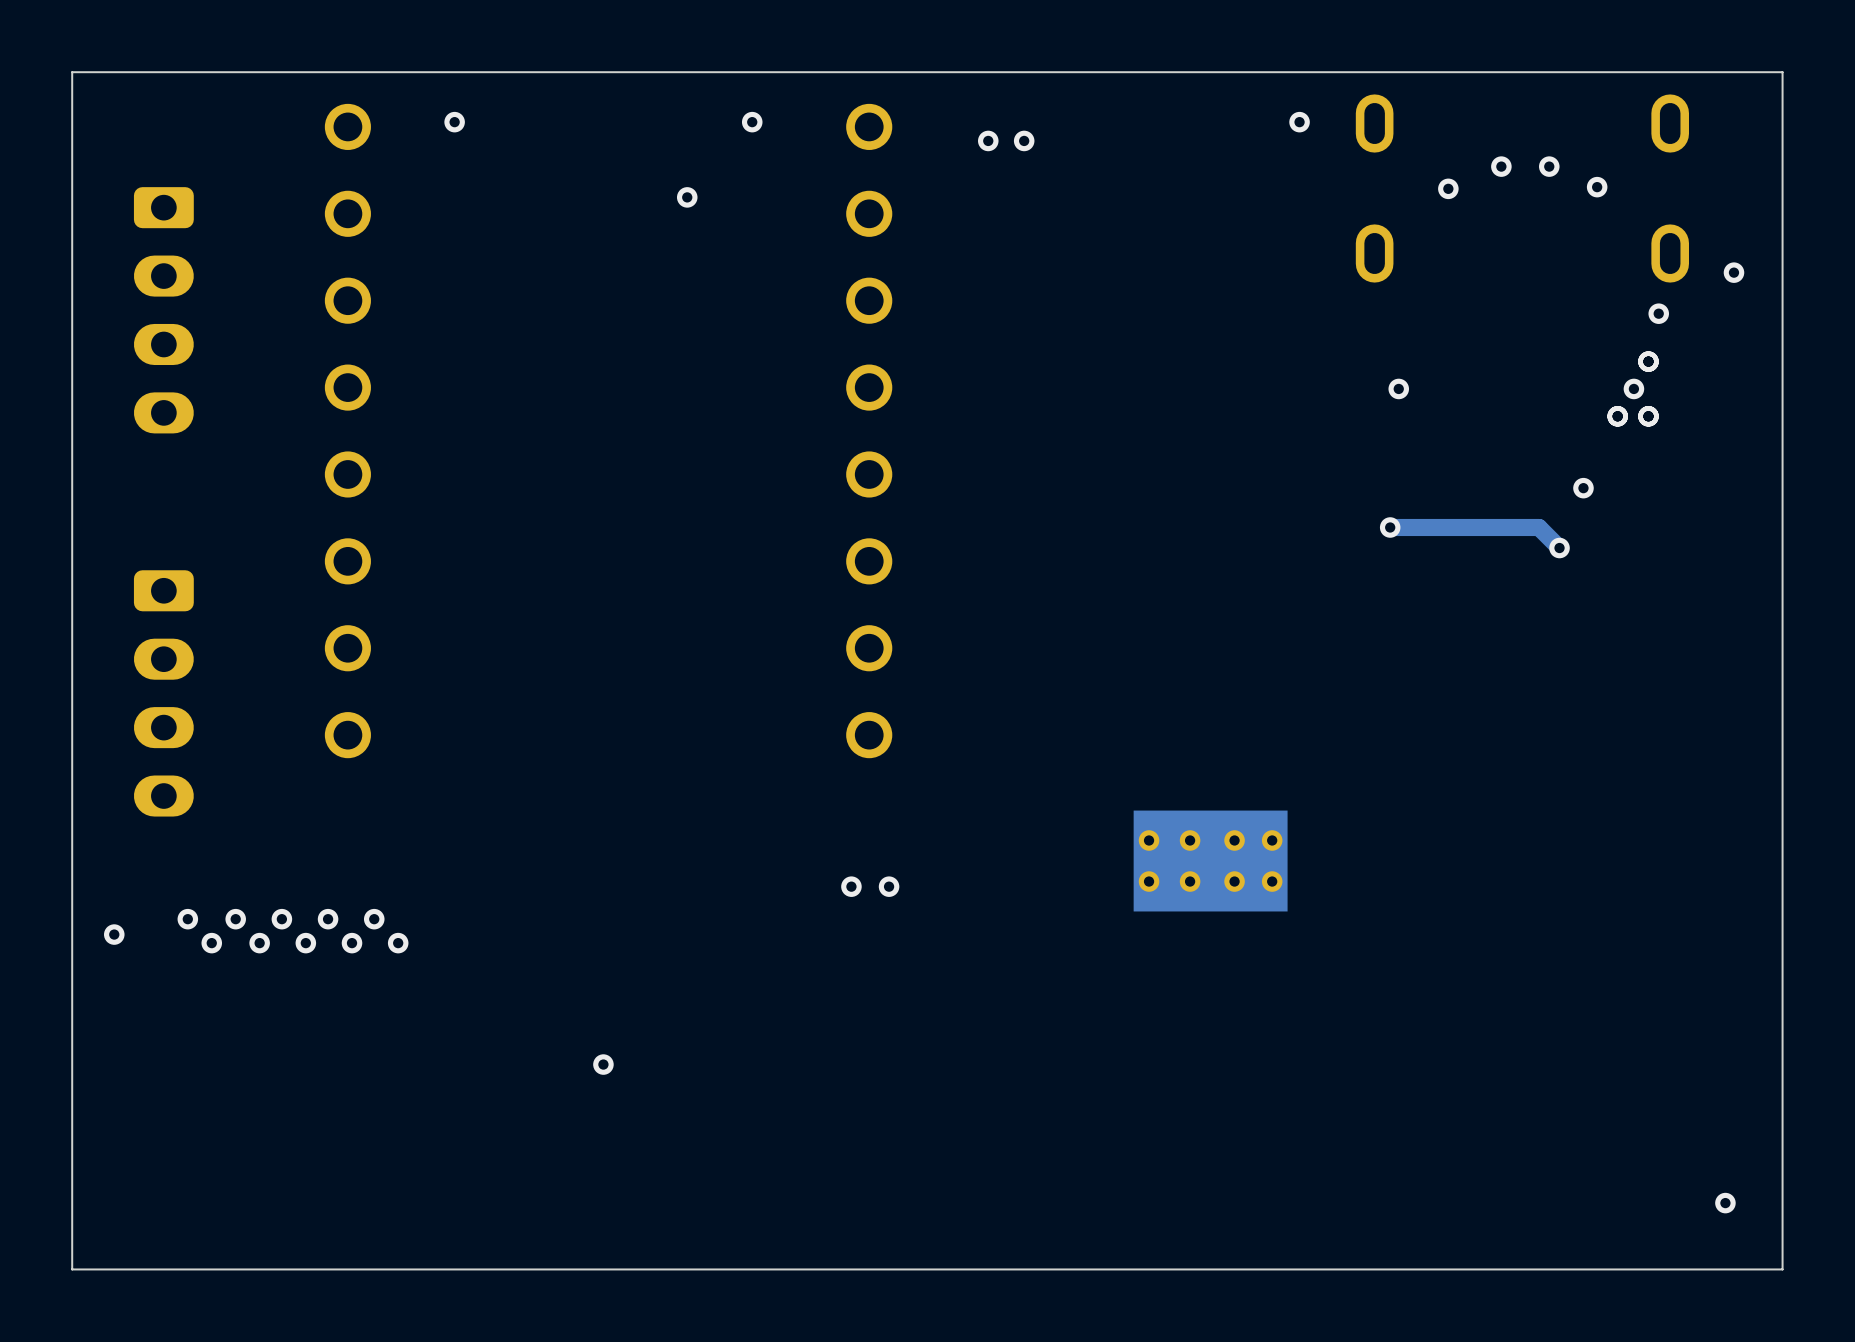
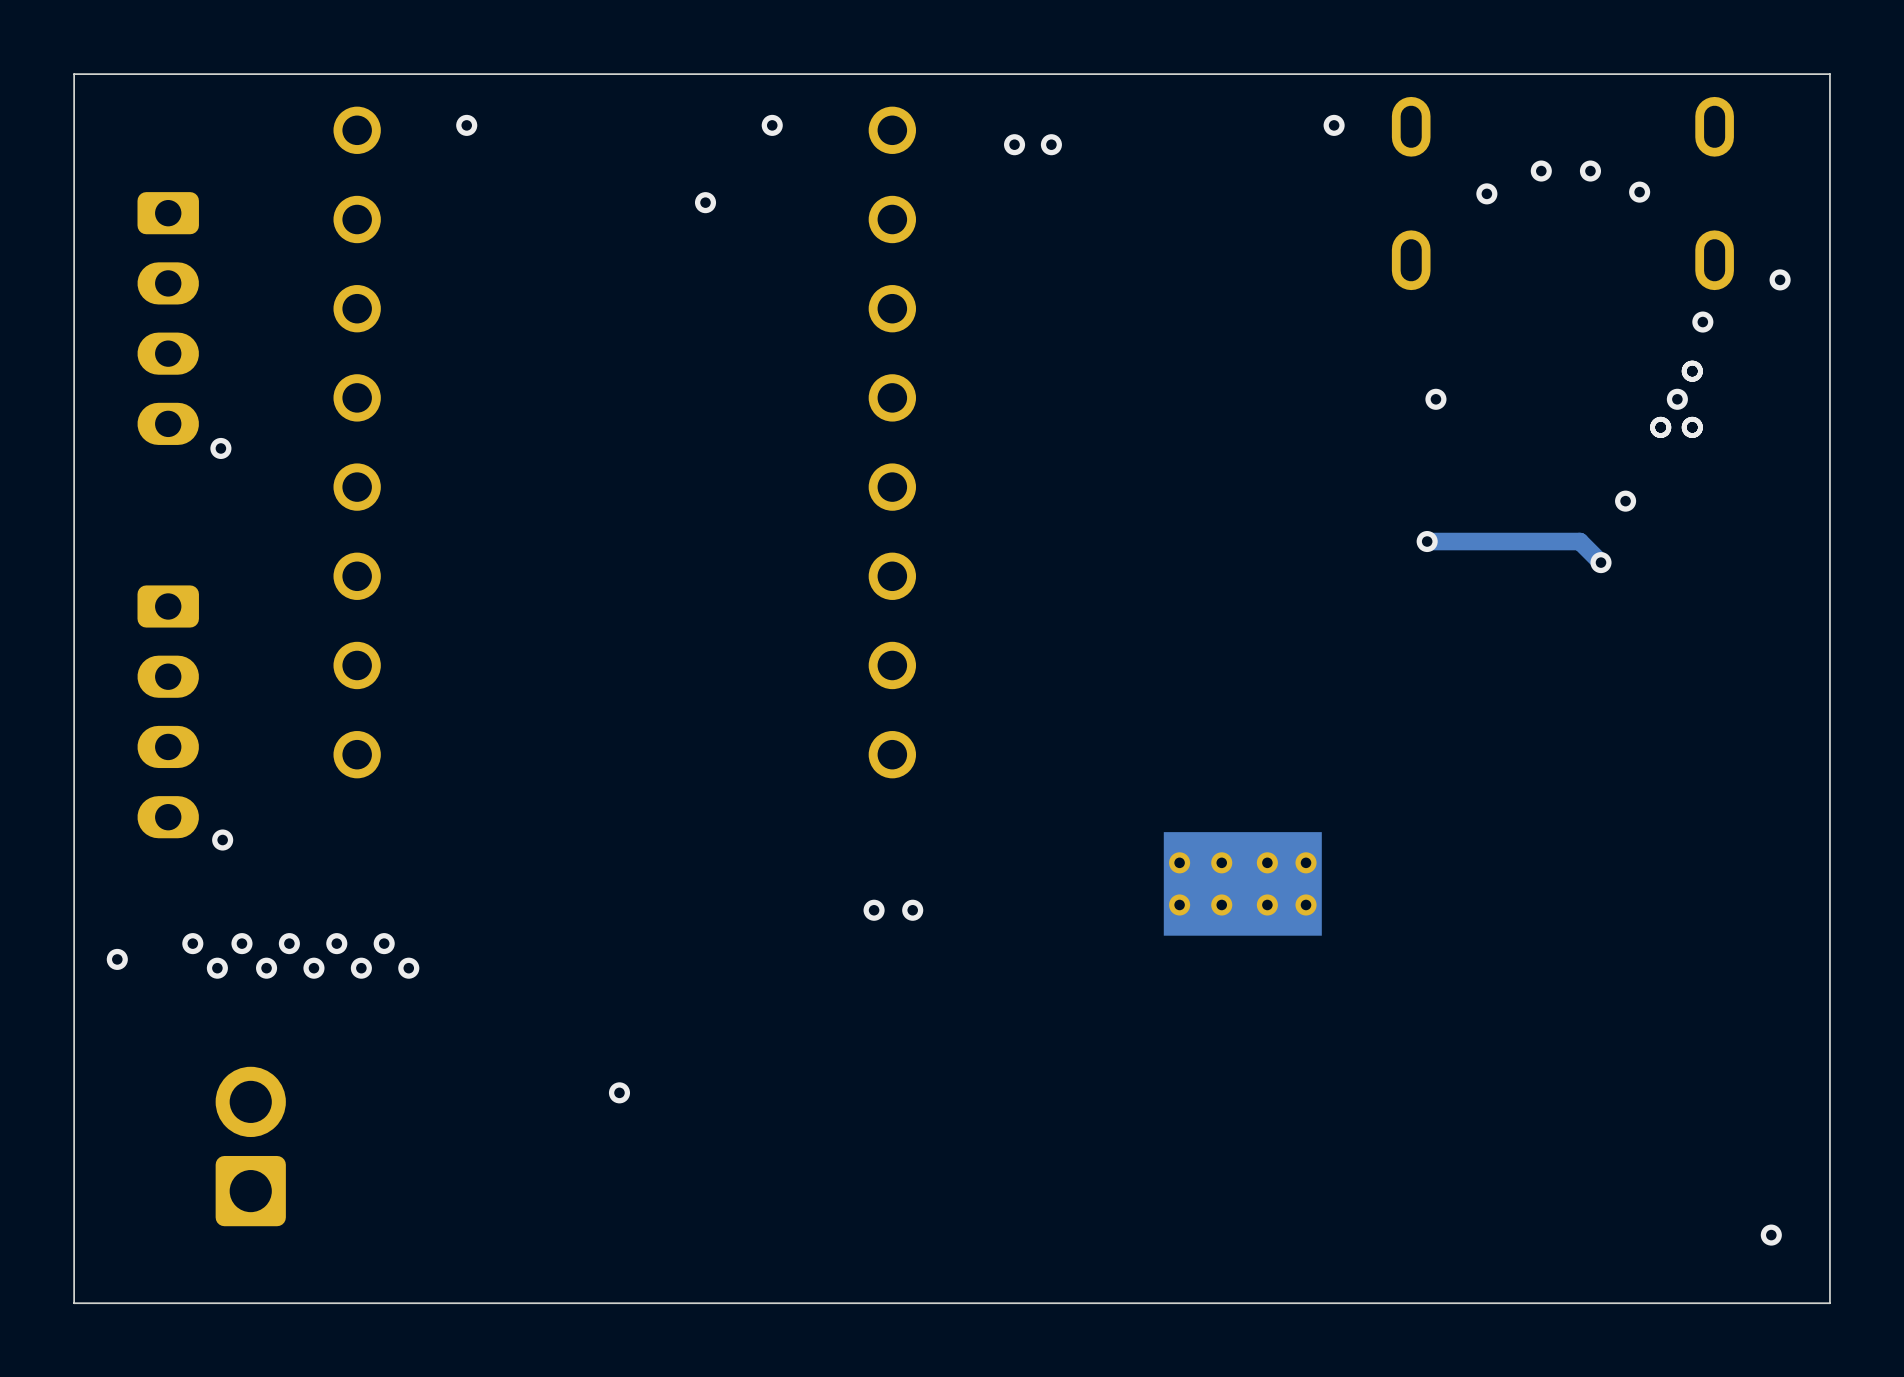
via: none -> (220, 448)
via: none -> (222, 840)
part: none -> (250, 1146)

